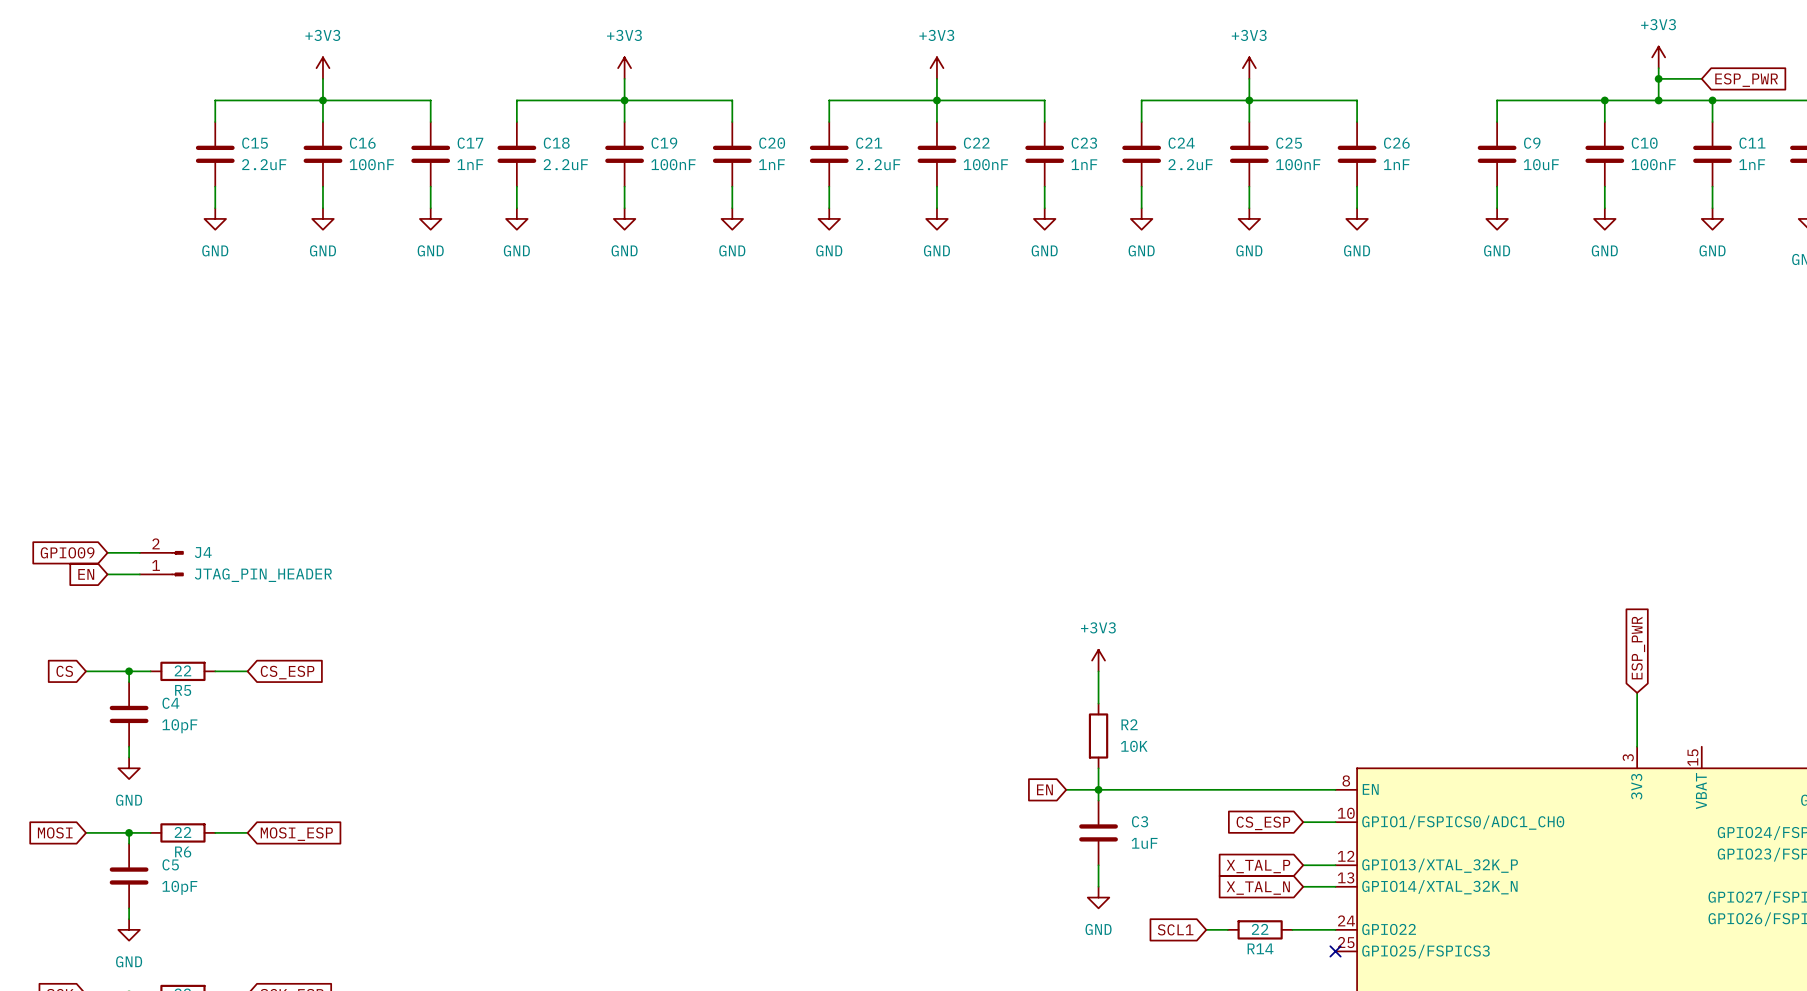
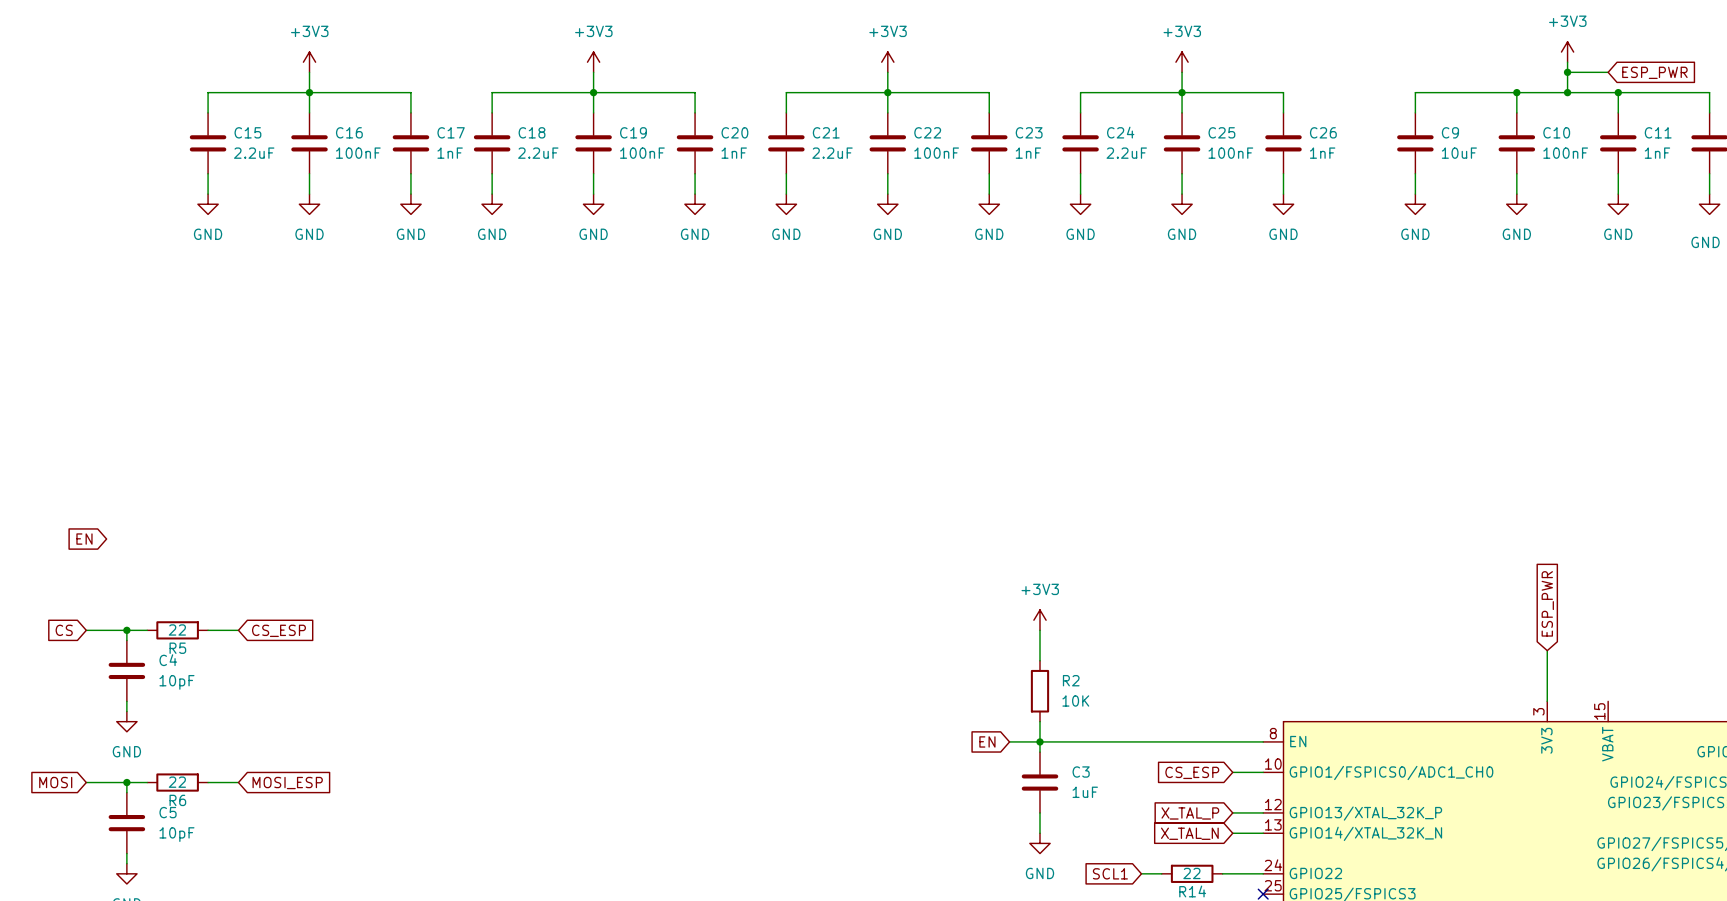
global label: GPIO09 (67, 552) -> none
wire: (107, 552) (139, 552) -> none
J4: JTAG_PIN_HEADER (161, 563) -> none
wire: (107, 574) (139, 574) -> none

